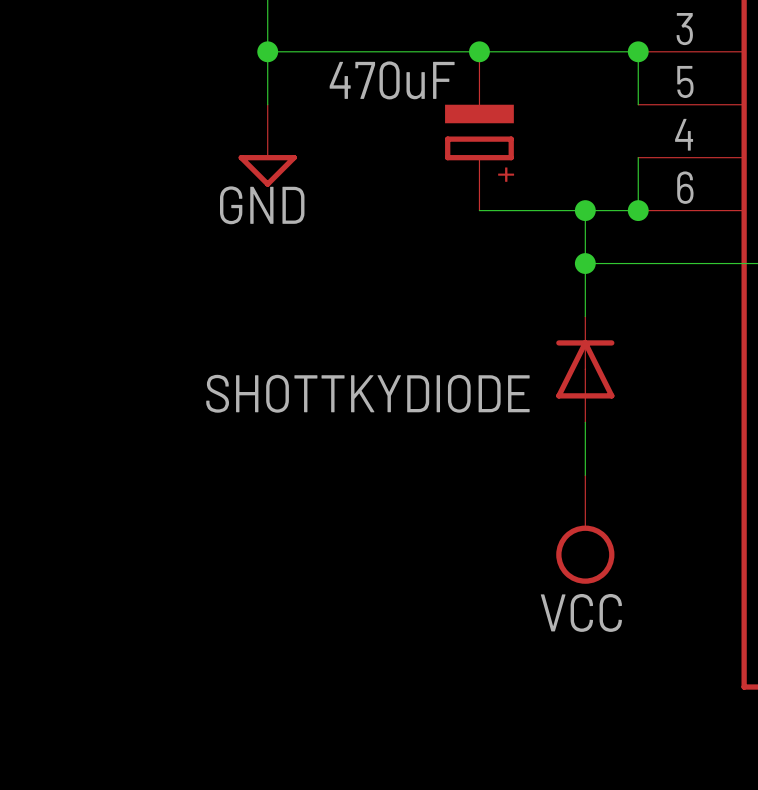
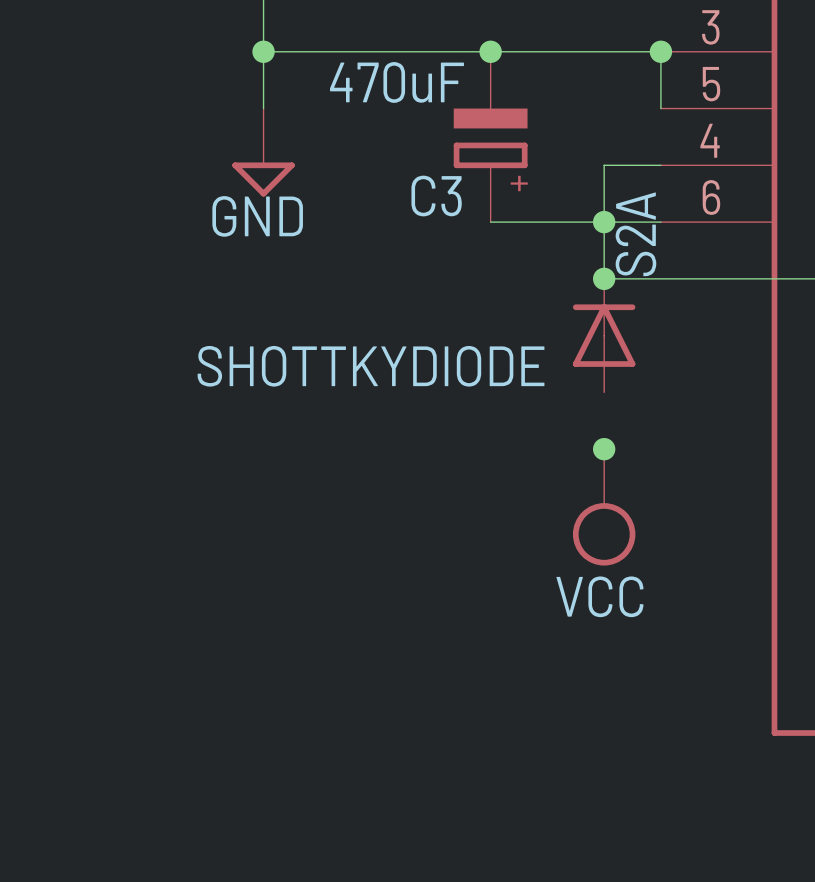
wire: (638, 157) (638, 210) -> (660, 165) (604, 165) (604, 222)
C3 name: none -> C3 (436, 196)
junction: (638, 210) -> none
SHOTTKYDIODE: none -> S2A (604, 335)
SHOTTKYDIODE: (585, 369) -> none
junction: none -> (604, 449)
power symbol position: VCC (585, 529) -> VCC (604, 507)

